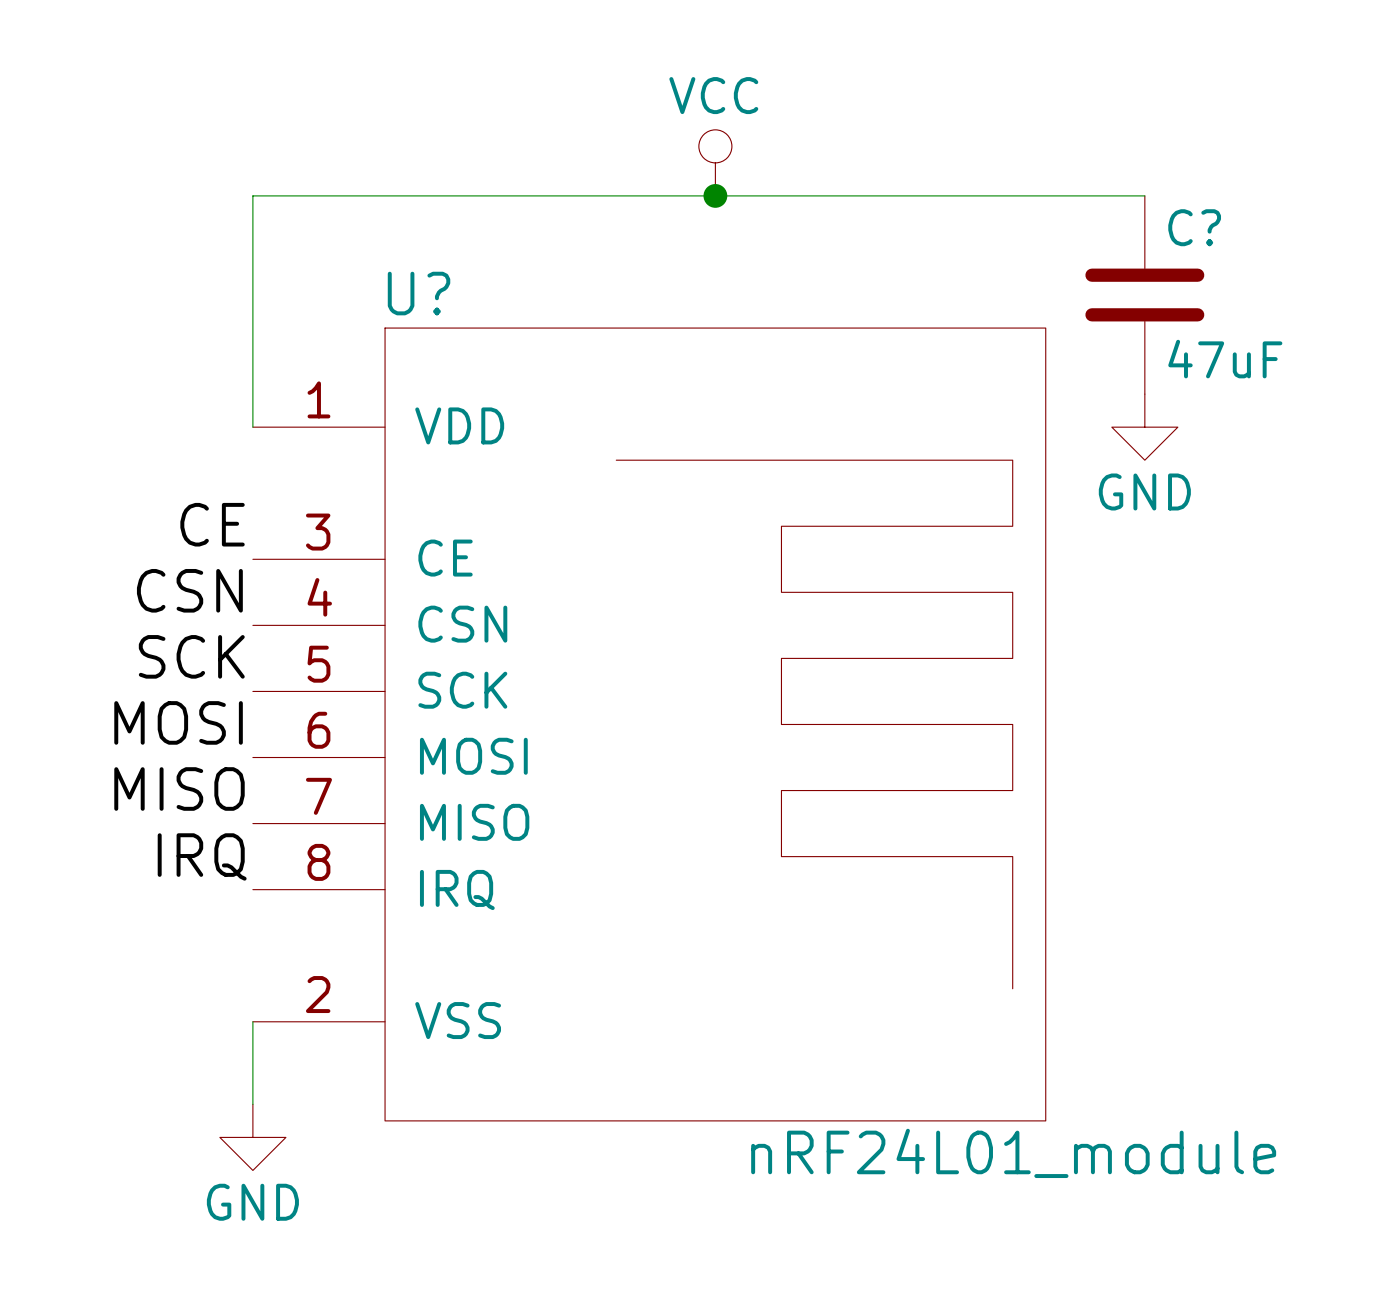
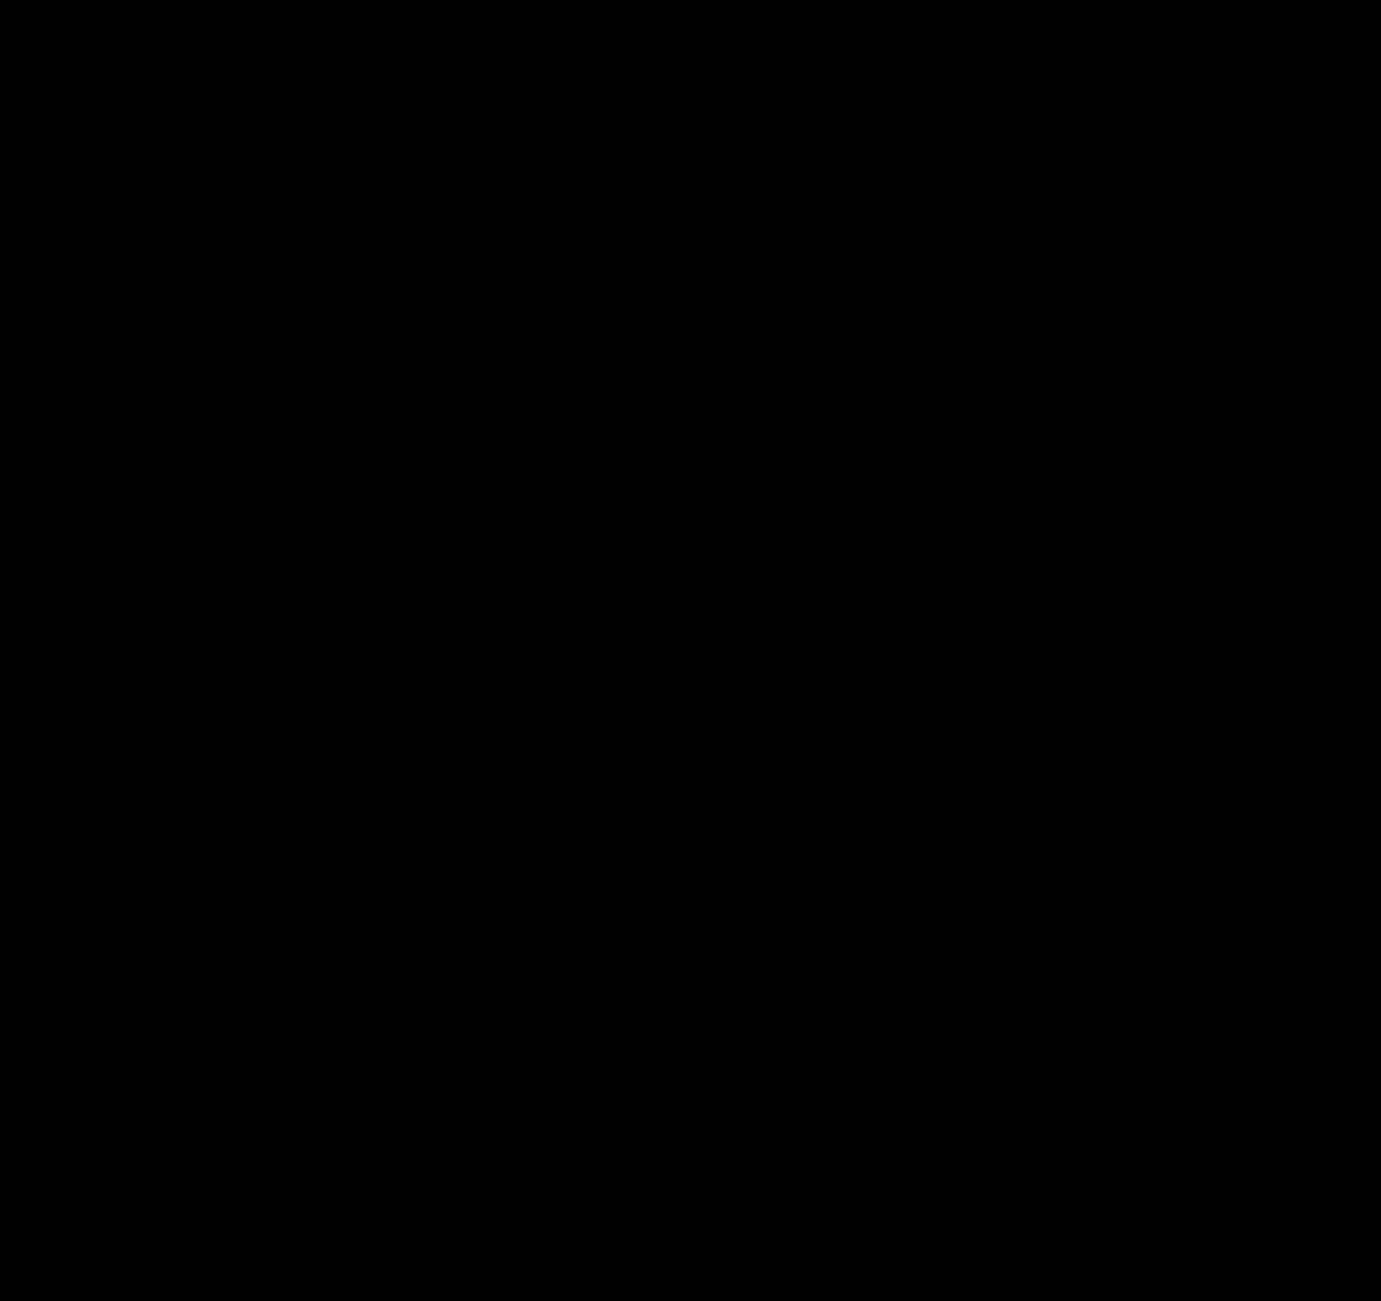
power symbol: VCC (715, 162) -> none
junction: (715, 195) -> none
wire: (1144, 195) (252, 195) (252, 427) -> none
C?: 47uF (1144, 295) -> none
power symbol: GND (1144, 427) -> none
label: CE (212, 524) -> none
label: CSN (189, 590) -> none
label: SCK (191, 656) -> none
label: MOSI (178, 722) -> none
U?: nRF24L01_module (649, 724) -> none
label: MISO (179, 788) -> none
label: IRQ (202, 856) -> none
wire: (252, 1021) (252, 1104) -> none
power symbol: GND (252, 1137) -> none

